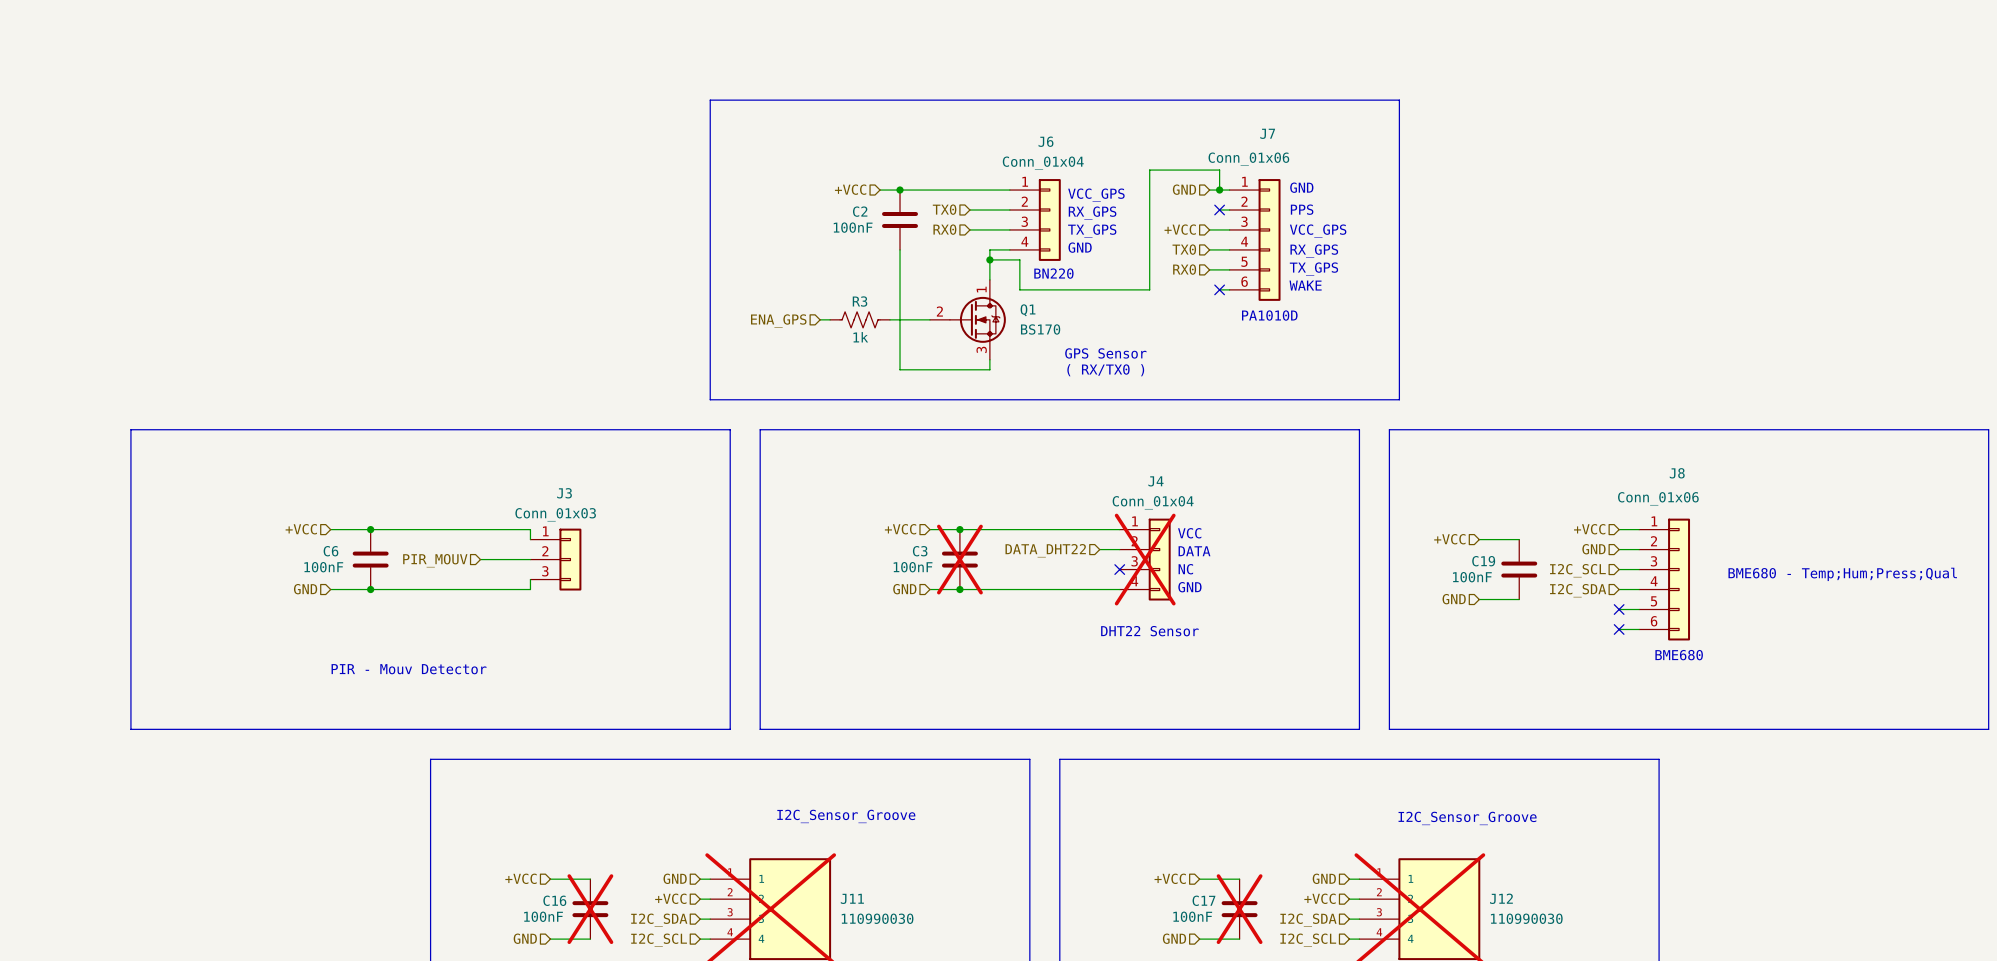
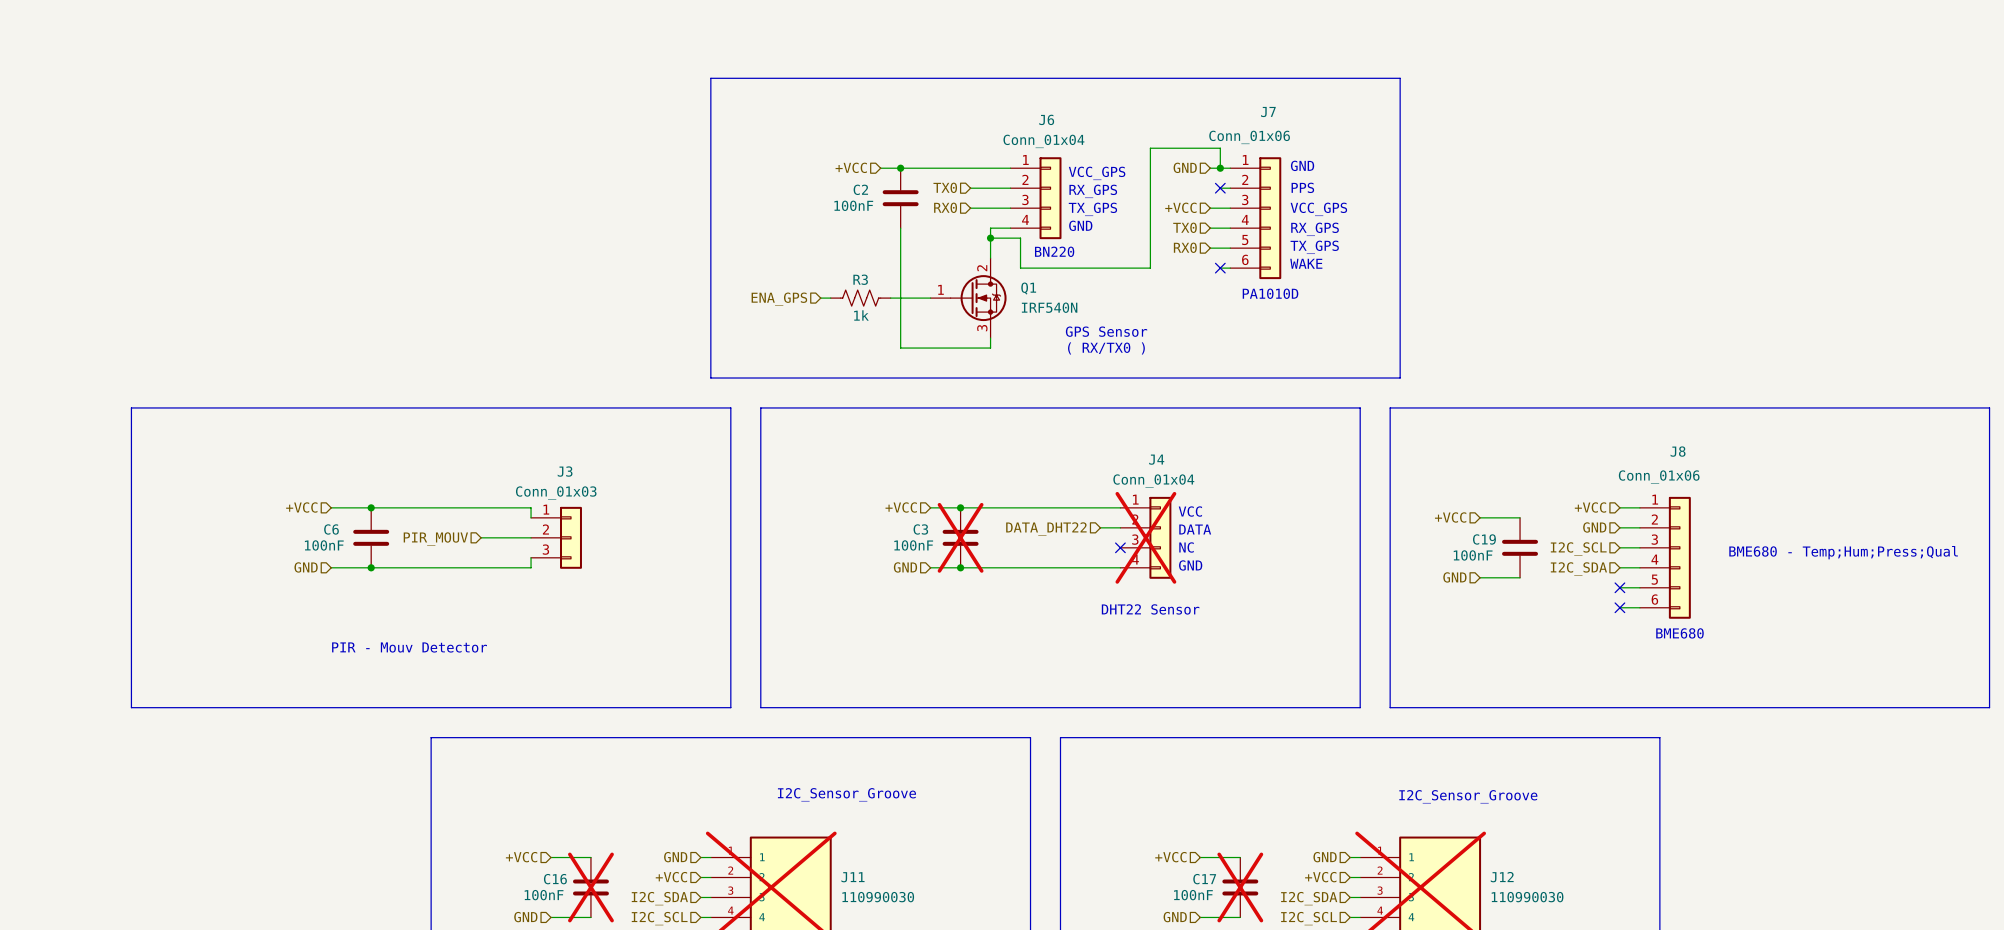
Q1 pin number: 1 (981, 289) -> 2 (982, 268)
Q1 pin number: 2 (939, 311) -> 1 (940, 289)
Q1 value: BS170 (1040, 329) -> IRF540N (1049, 307)

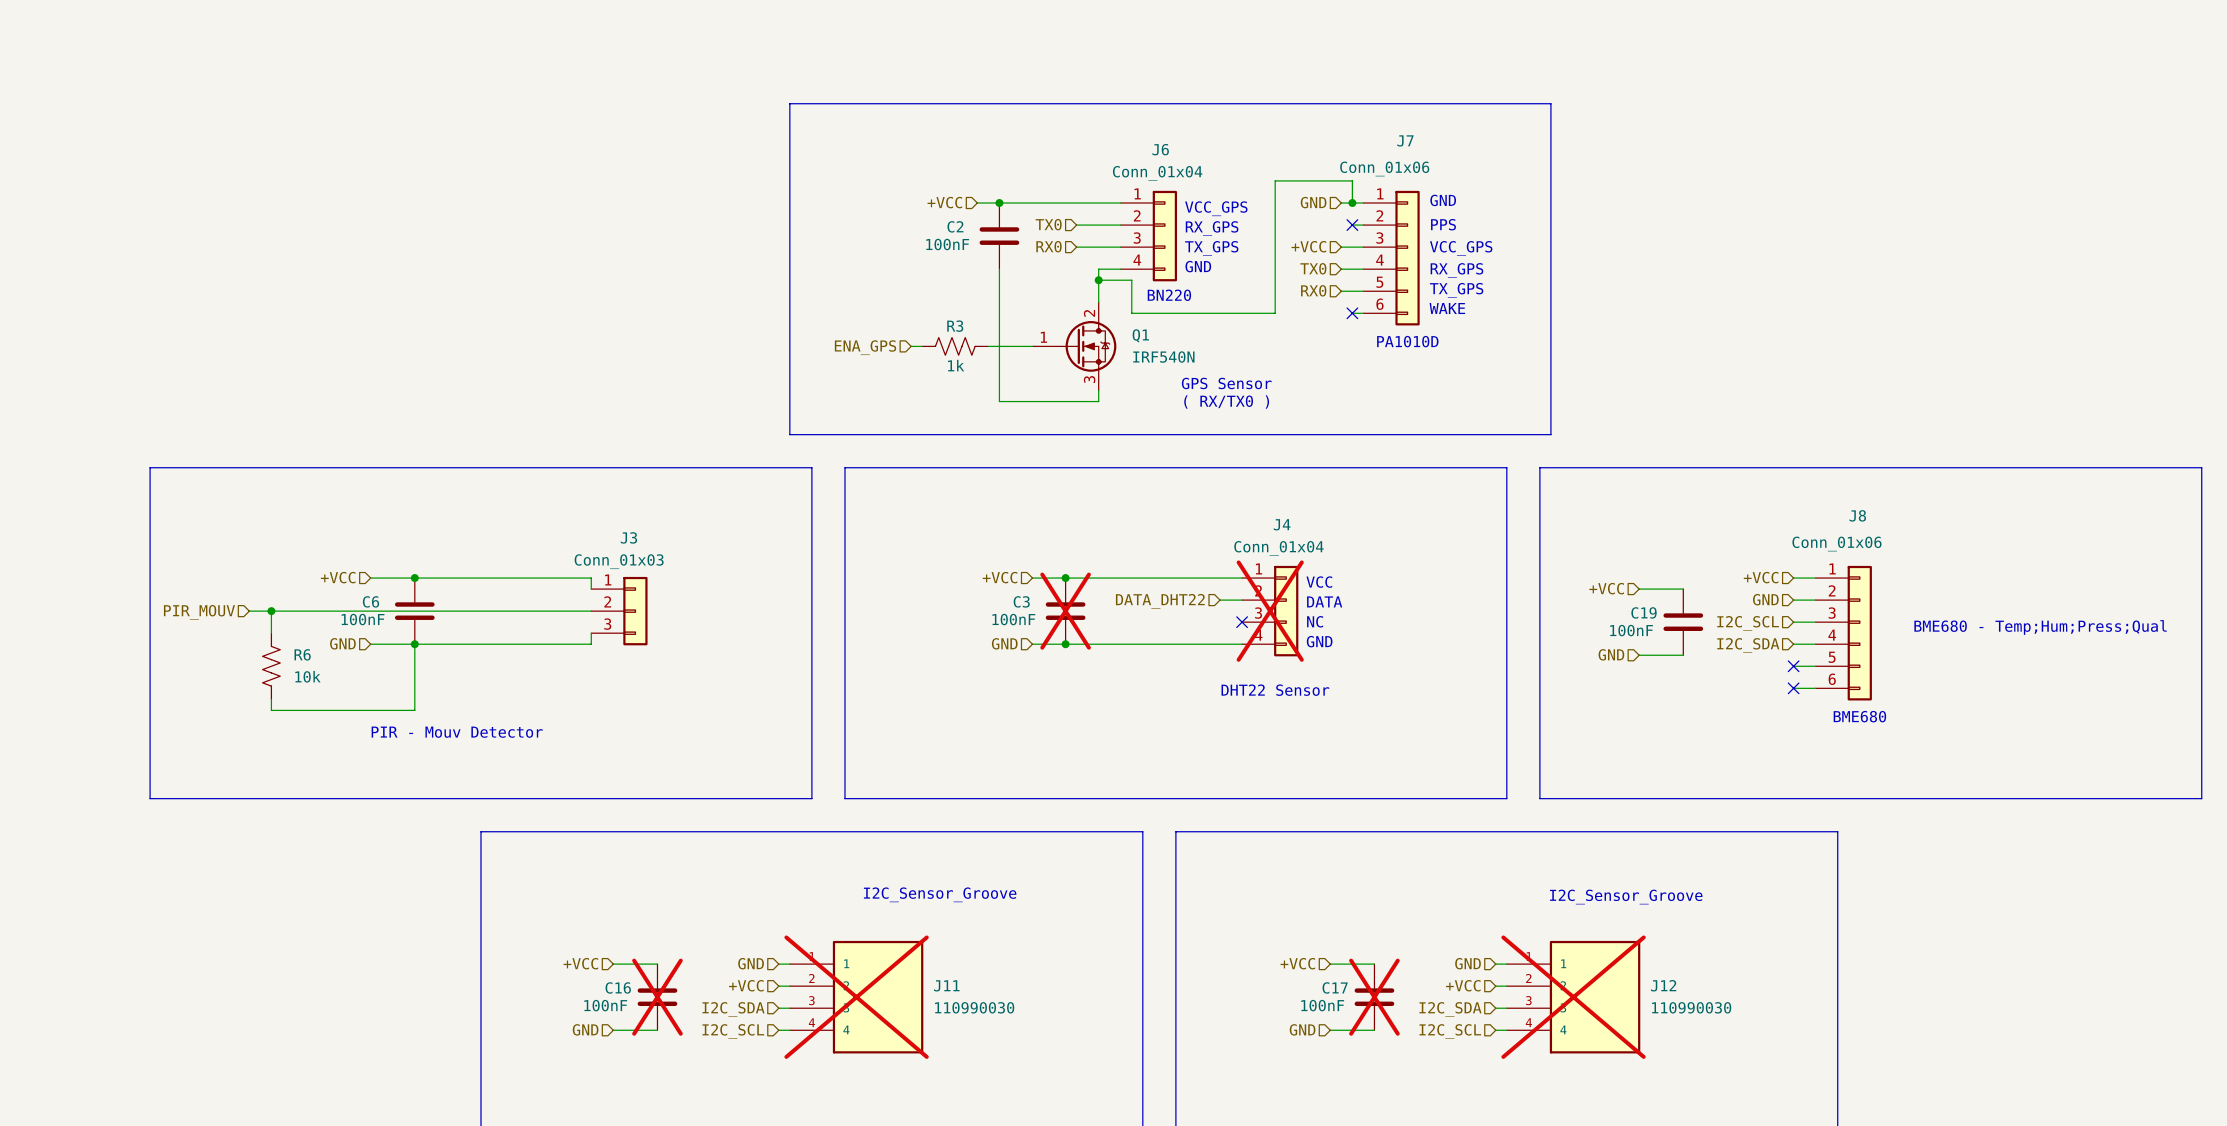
wire: none -> (249, 611) (536, 611)
wire: none -> (271, 611) (271, 633)
junction: none -> (271, 611)
hierarchical label: none -> PIR_MOUV (199, 612)
hierarchical label: PIR_MOUV (435, 538) -> none
wire: none -> (414, 644) (414, 710) (271, 710) (271, 699)
R6: none -> 10k (271, 666)

